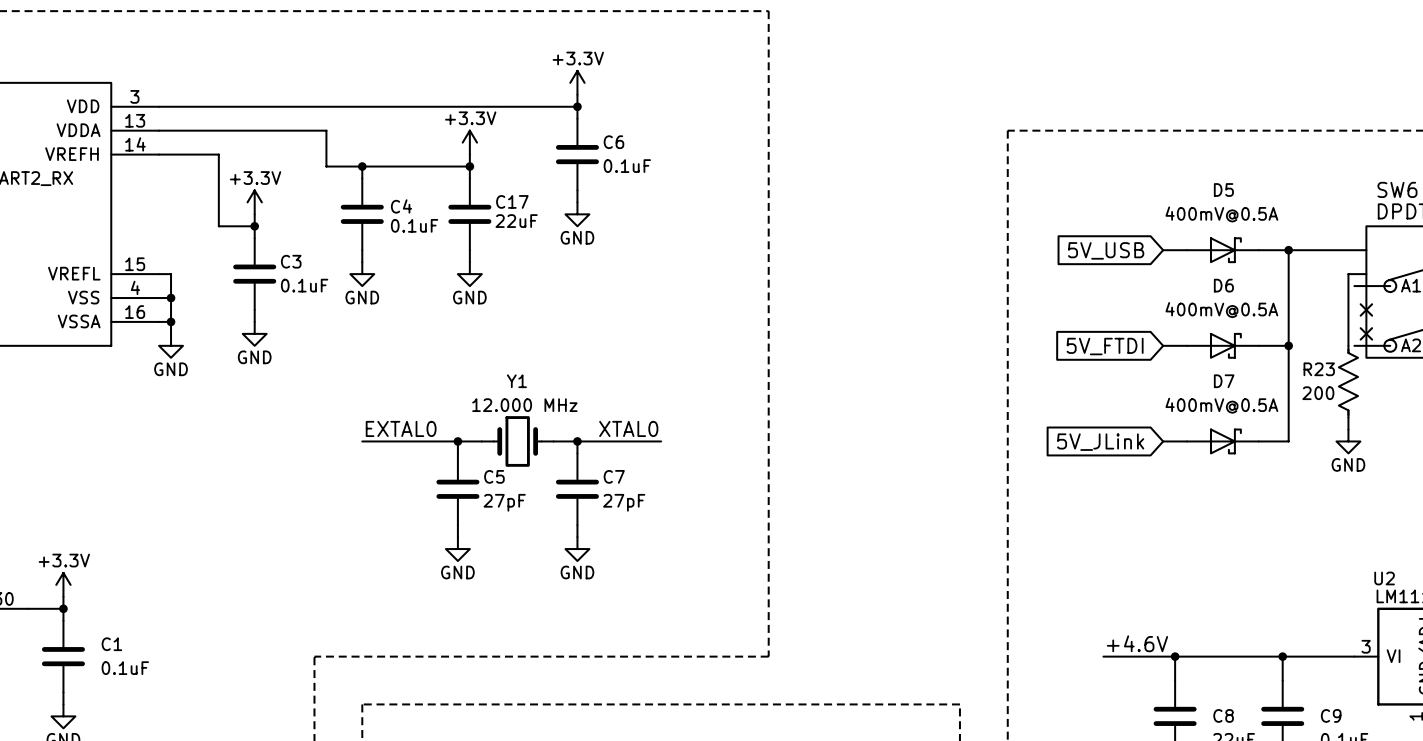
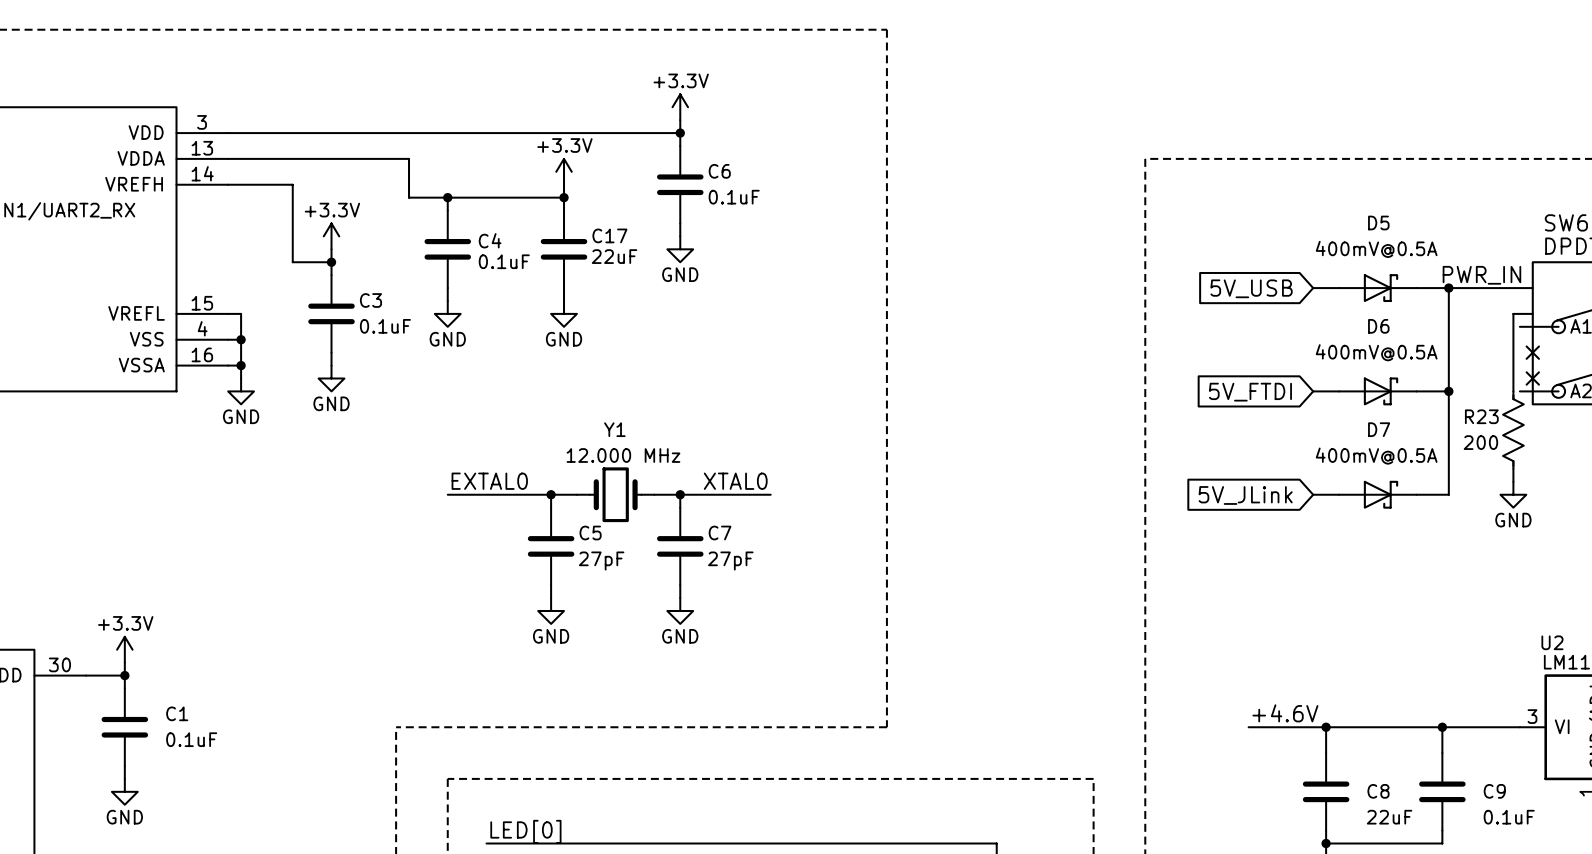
label: none -> PWR_IN (1481, 275)

